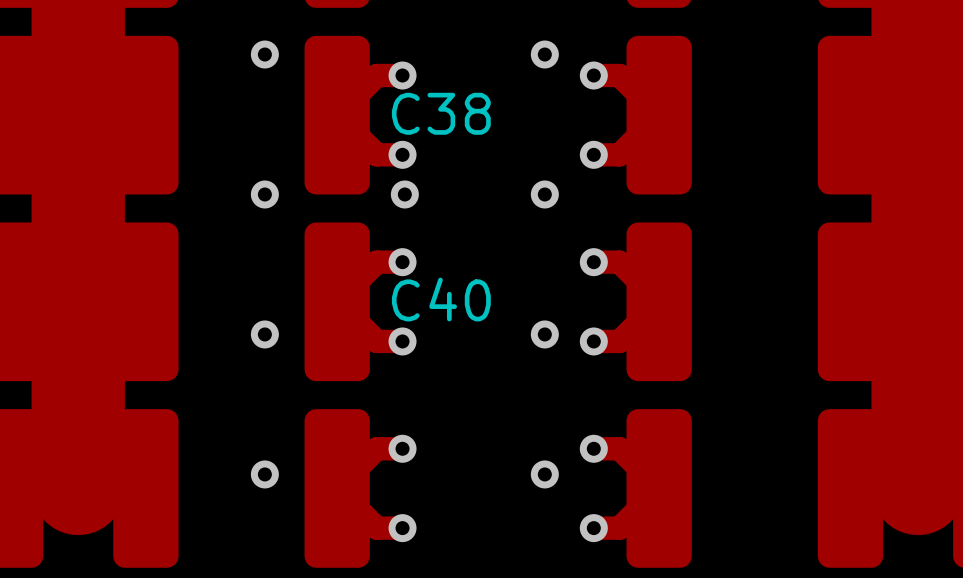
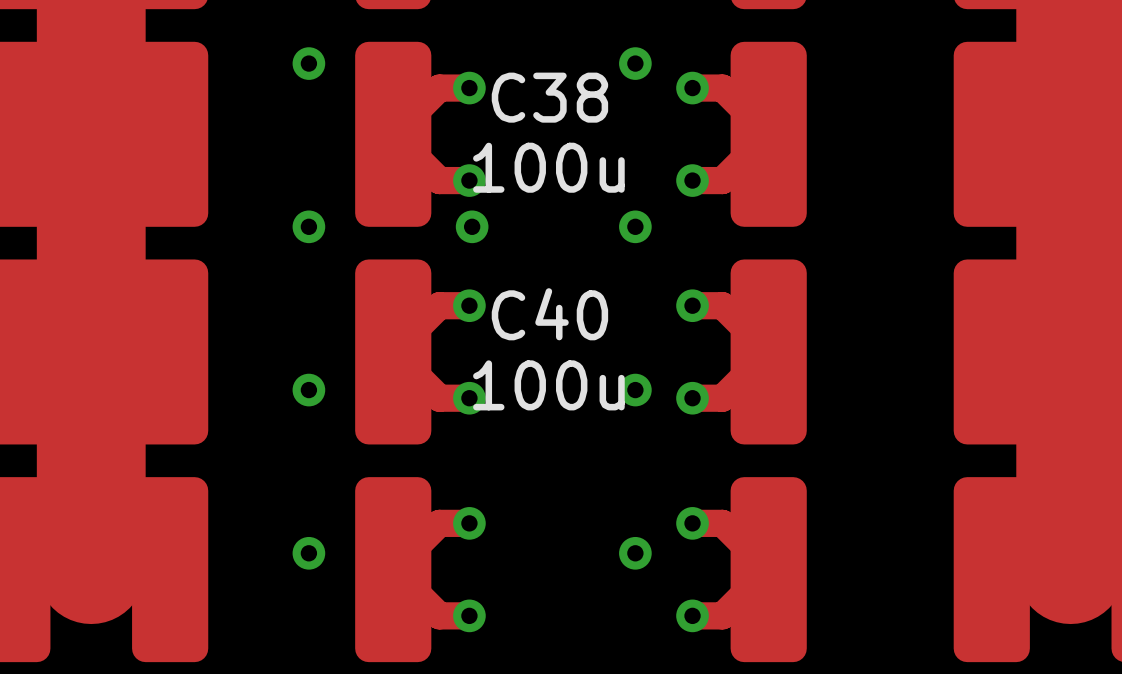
text position: C38 (441, 113) -> C38 (549, 97)
text: none -> 100u (548, 167)
text position: C40 (441, 299) -> C40 (549, 314)
text: none -> 100u (548, 385)

